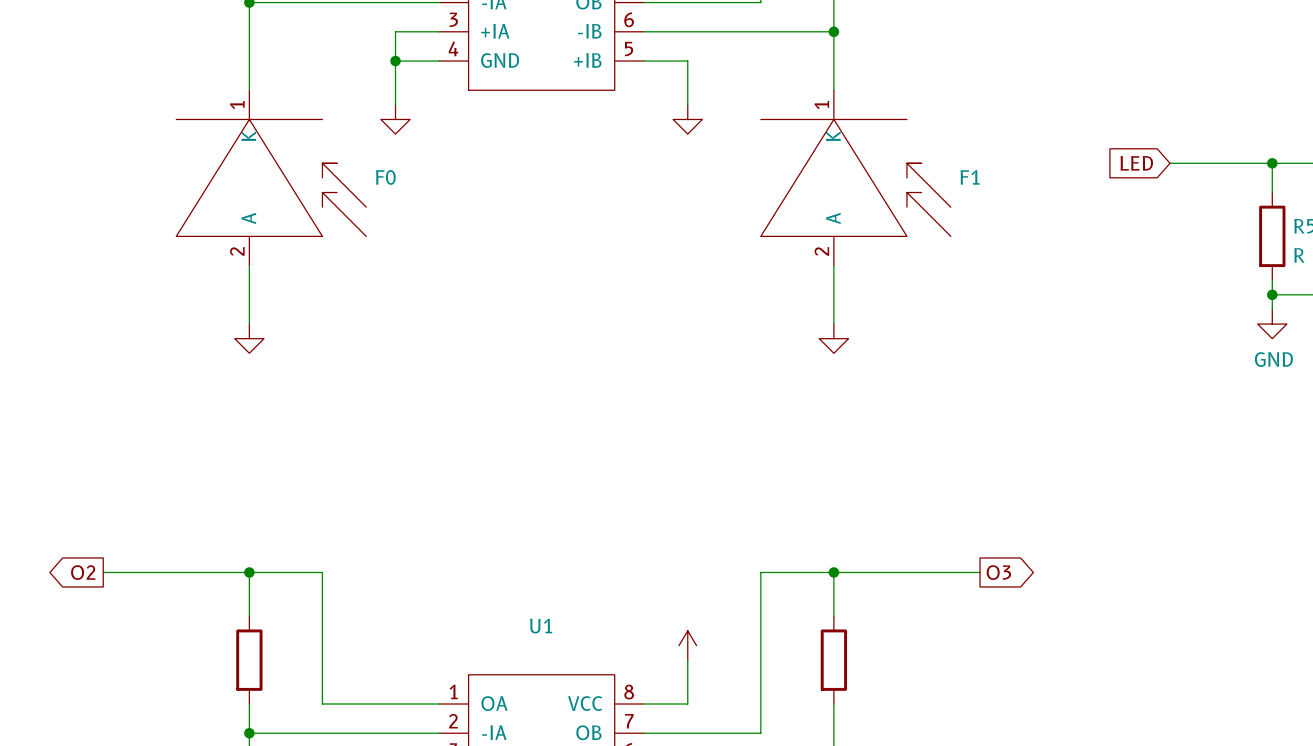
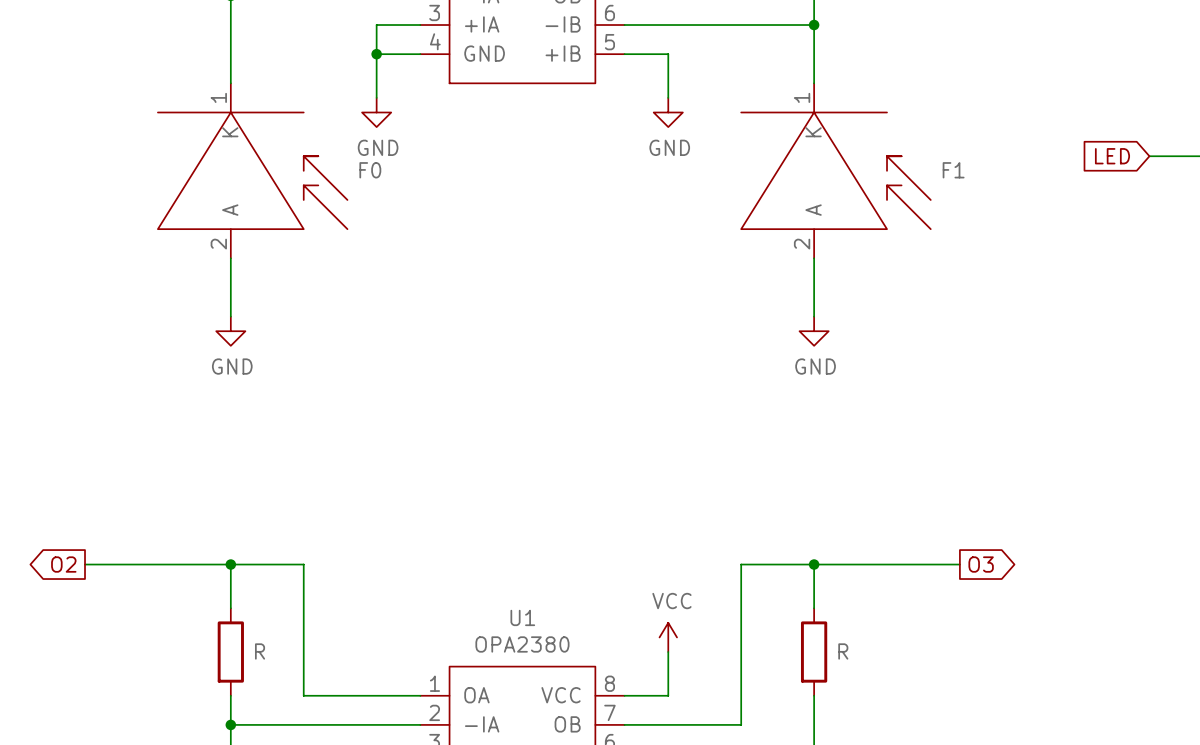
power symbol text: none -> GND (378, 147)
power symbol text: none -> GND (669, 147)
power symbol text: none -> GND (232, 366)
power symbol text: none -> GND (815, 366)
power symbol text: none -> VCC (671, 601)
U1 value: none -> OPA2380 (522, 644)
part value: none -> R (260, 651)
part value: none -> R (843, 651)

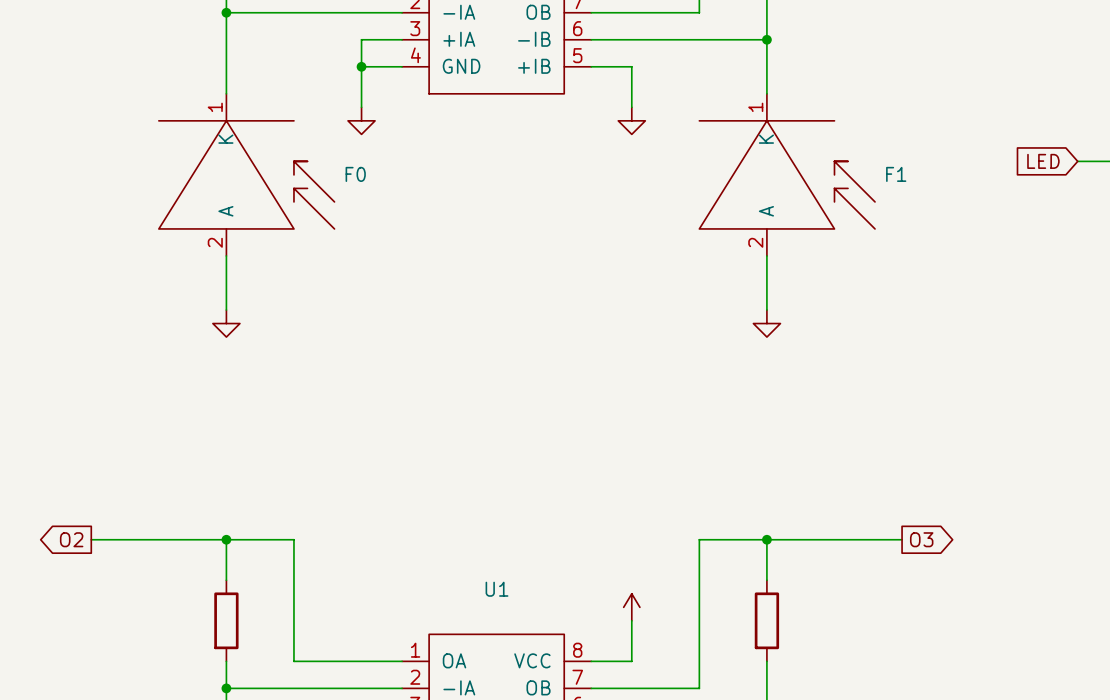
power symbol text: GND (378, 147) -> none
power symbol text: GND (669, 147) -> none
power symbol text: GND (232, 366) -> none
power symbol text: GND (815, 366) -> none
power symbol text: VCC (671, 601) -> none
U1 value: OPA2380 (522, 644) -> none
part value: R (260, 651) -> none
part value: R (843, 651) -> none

